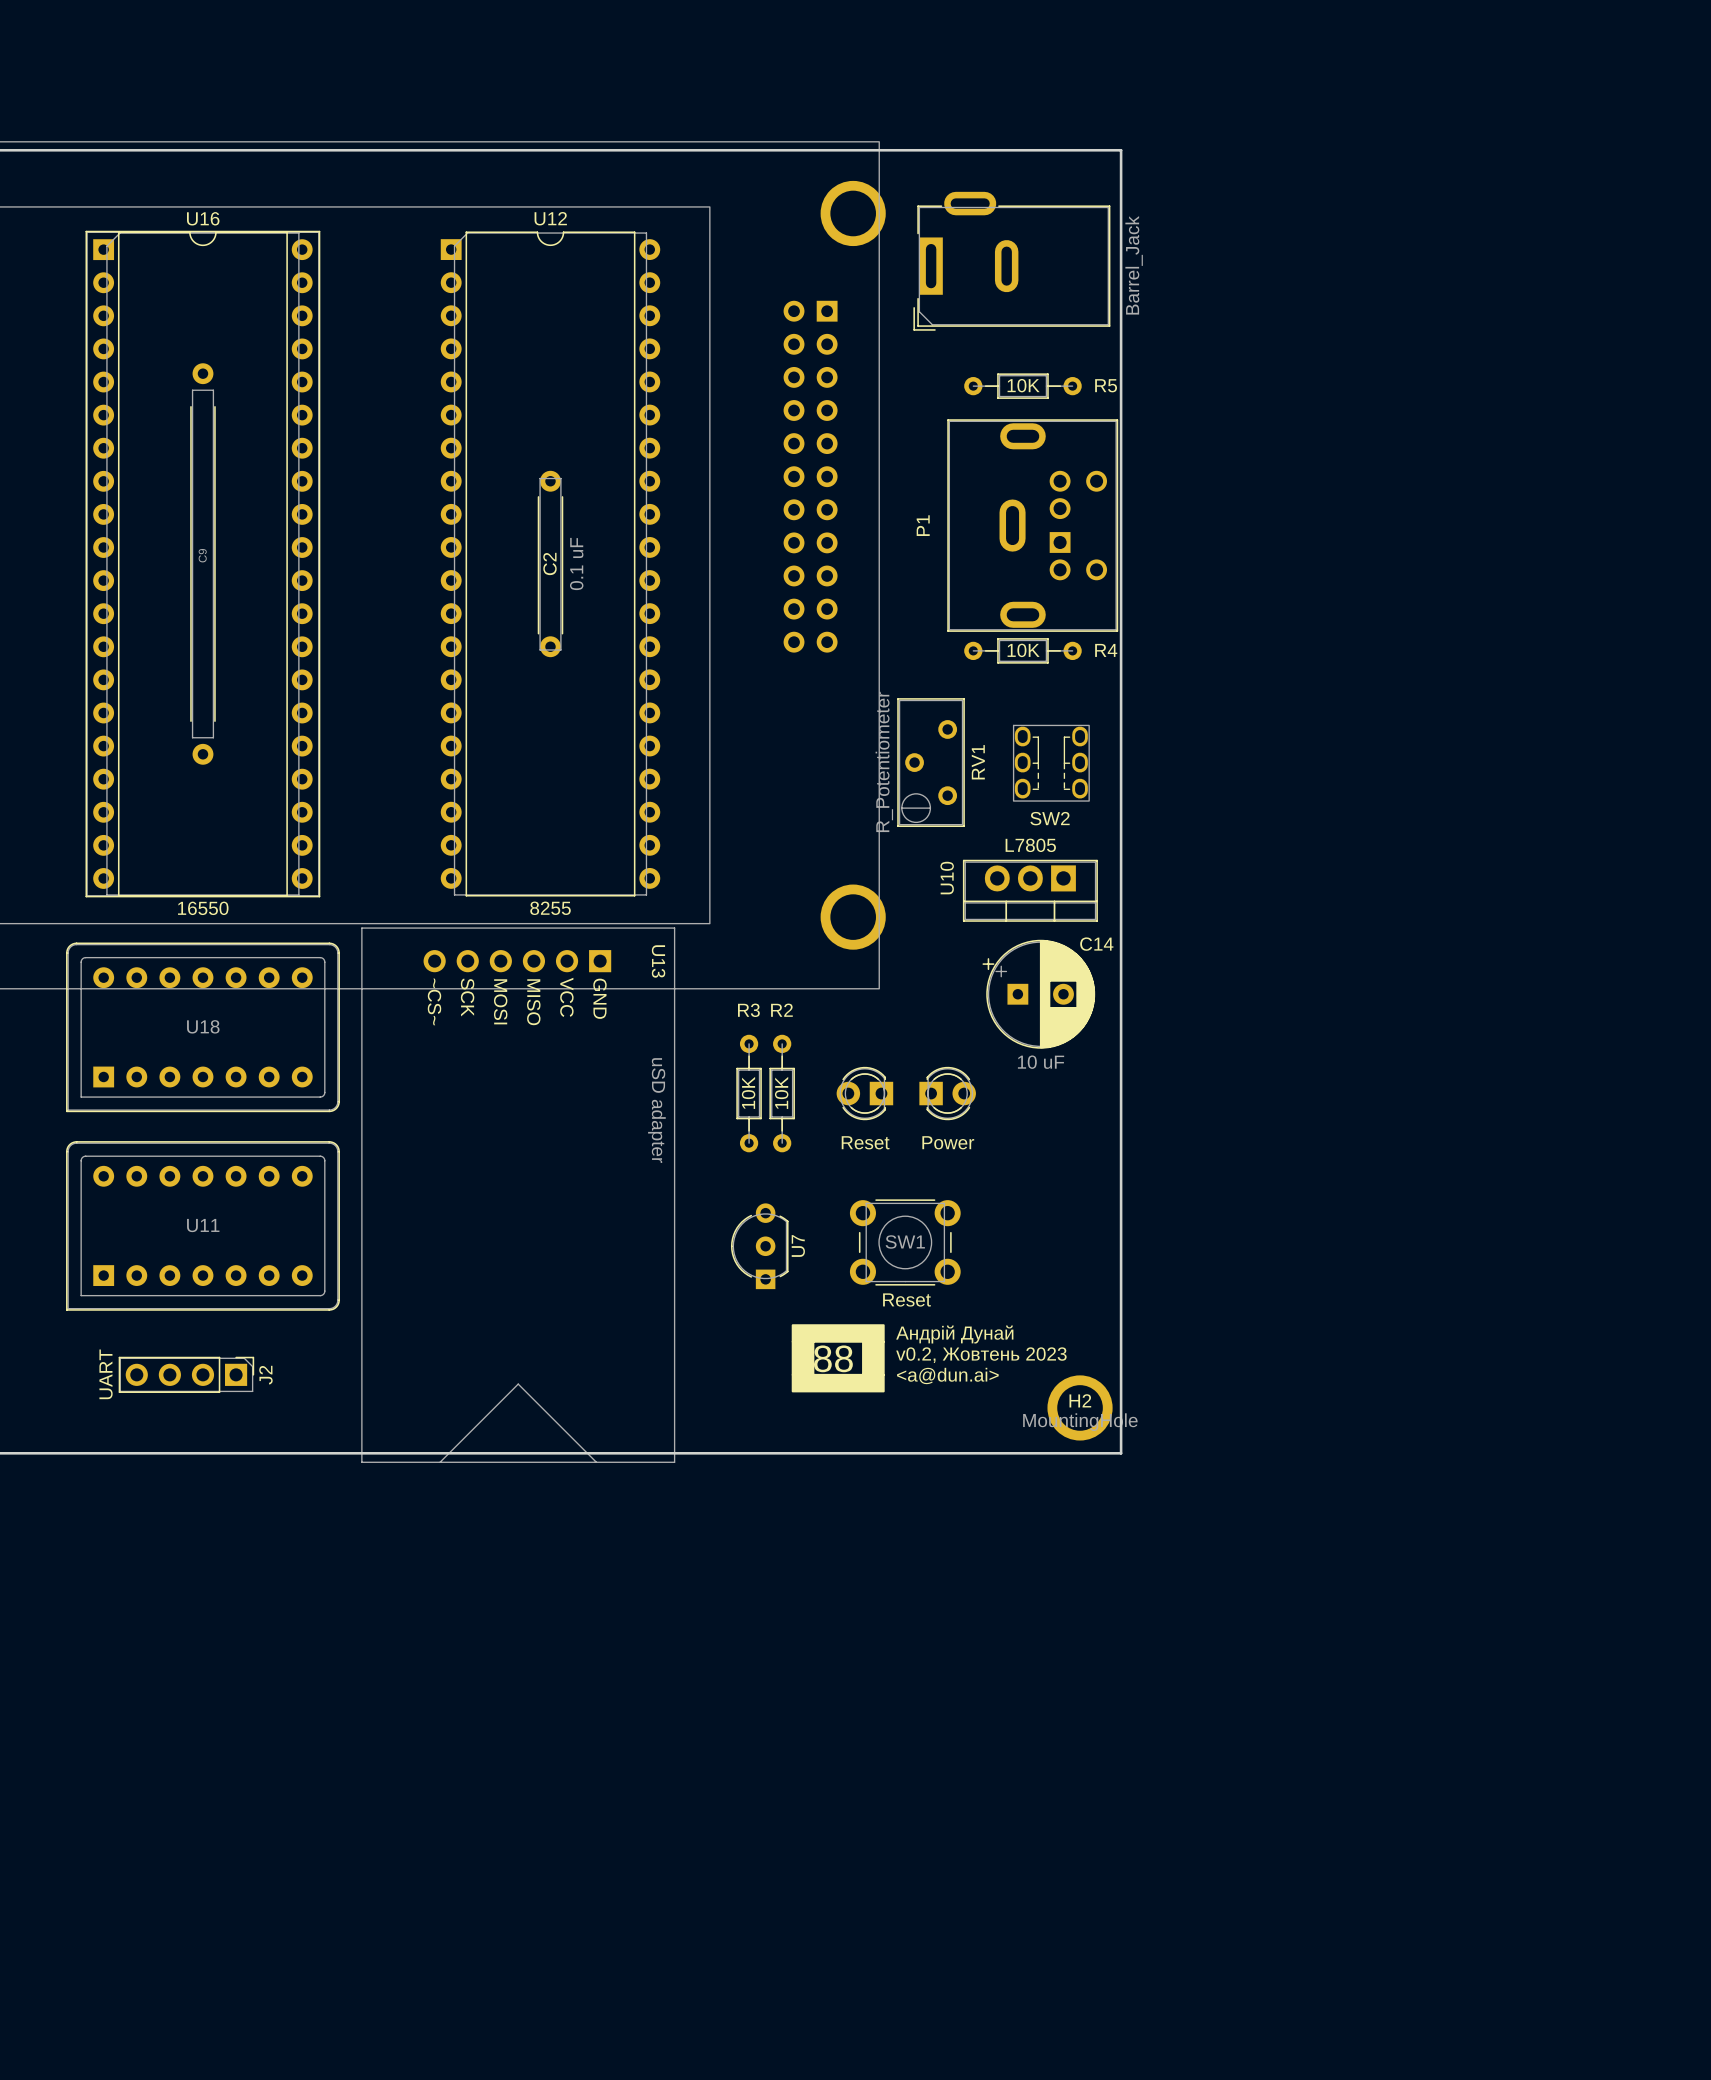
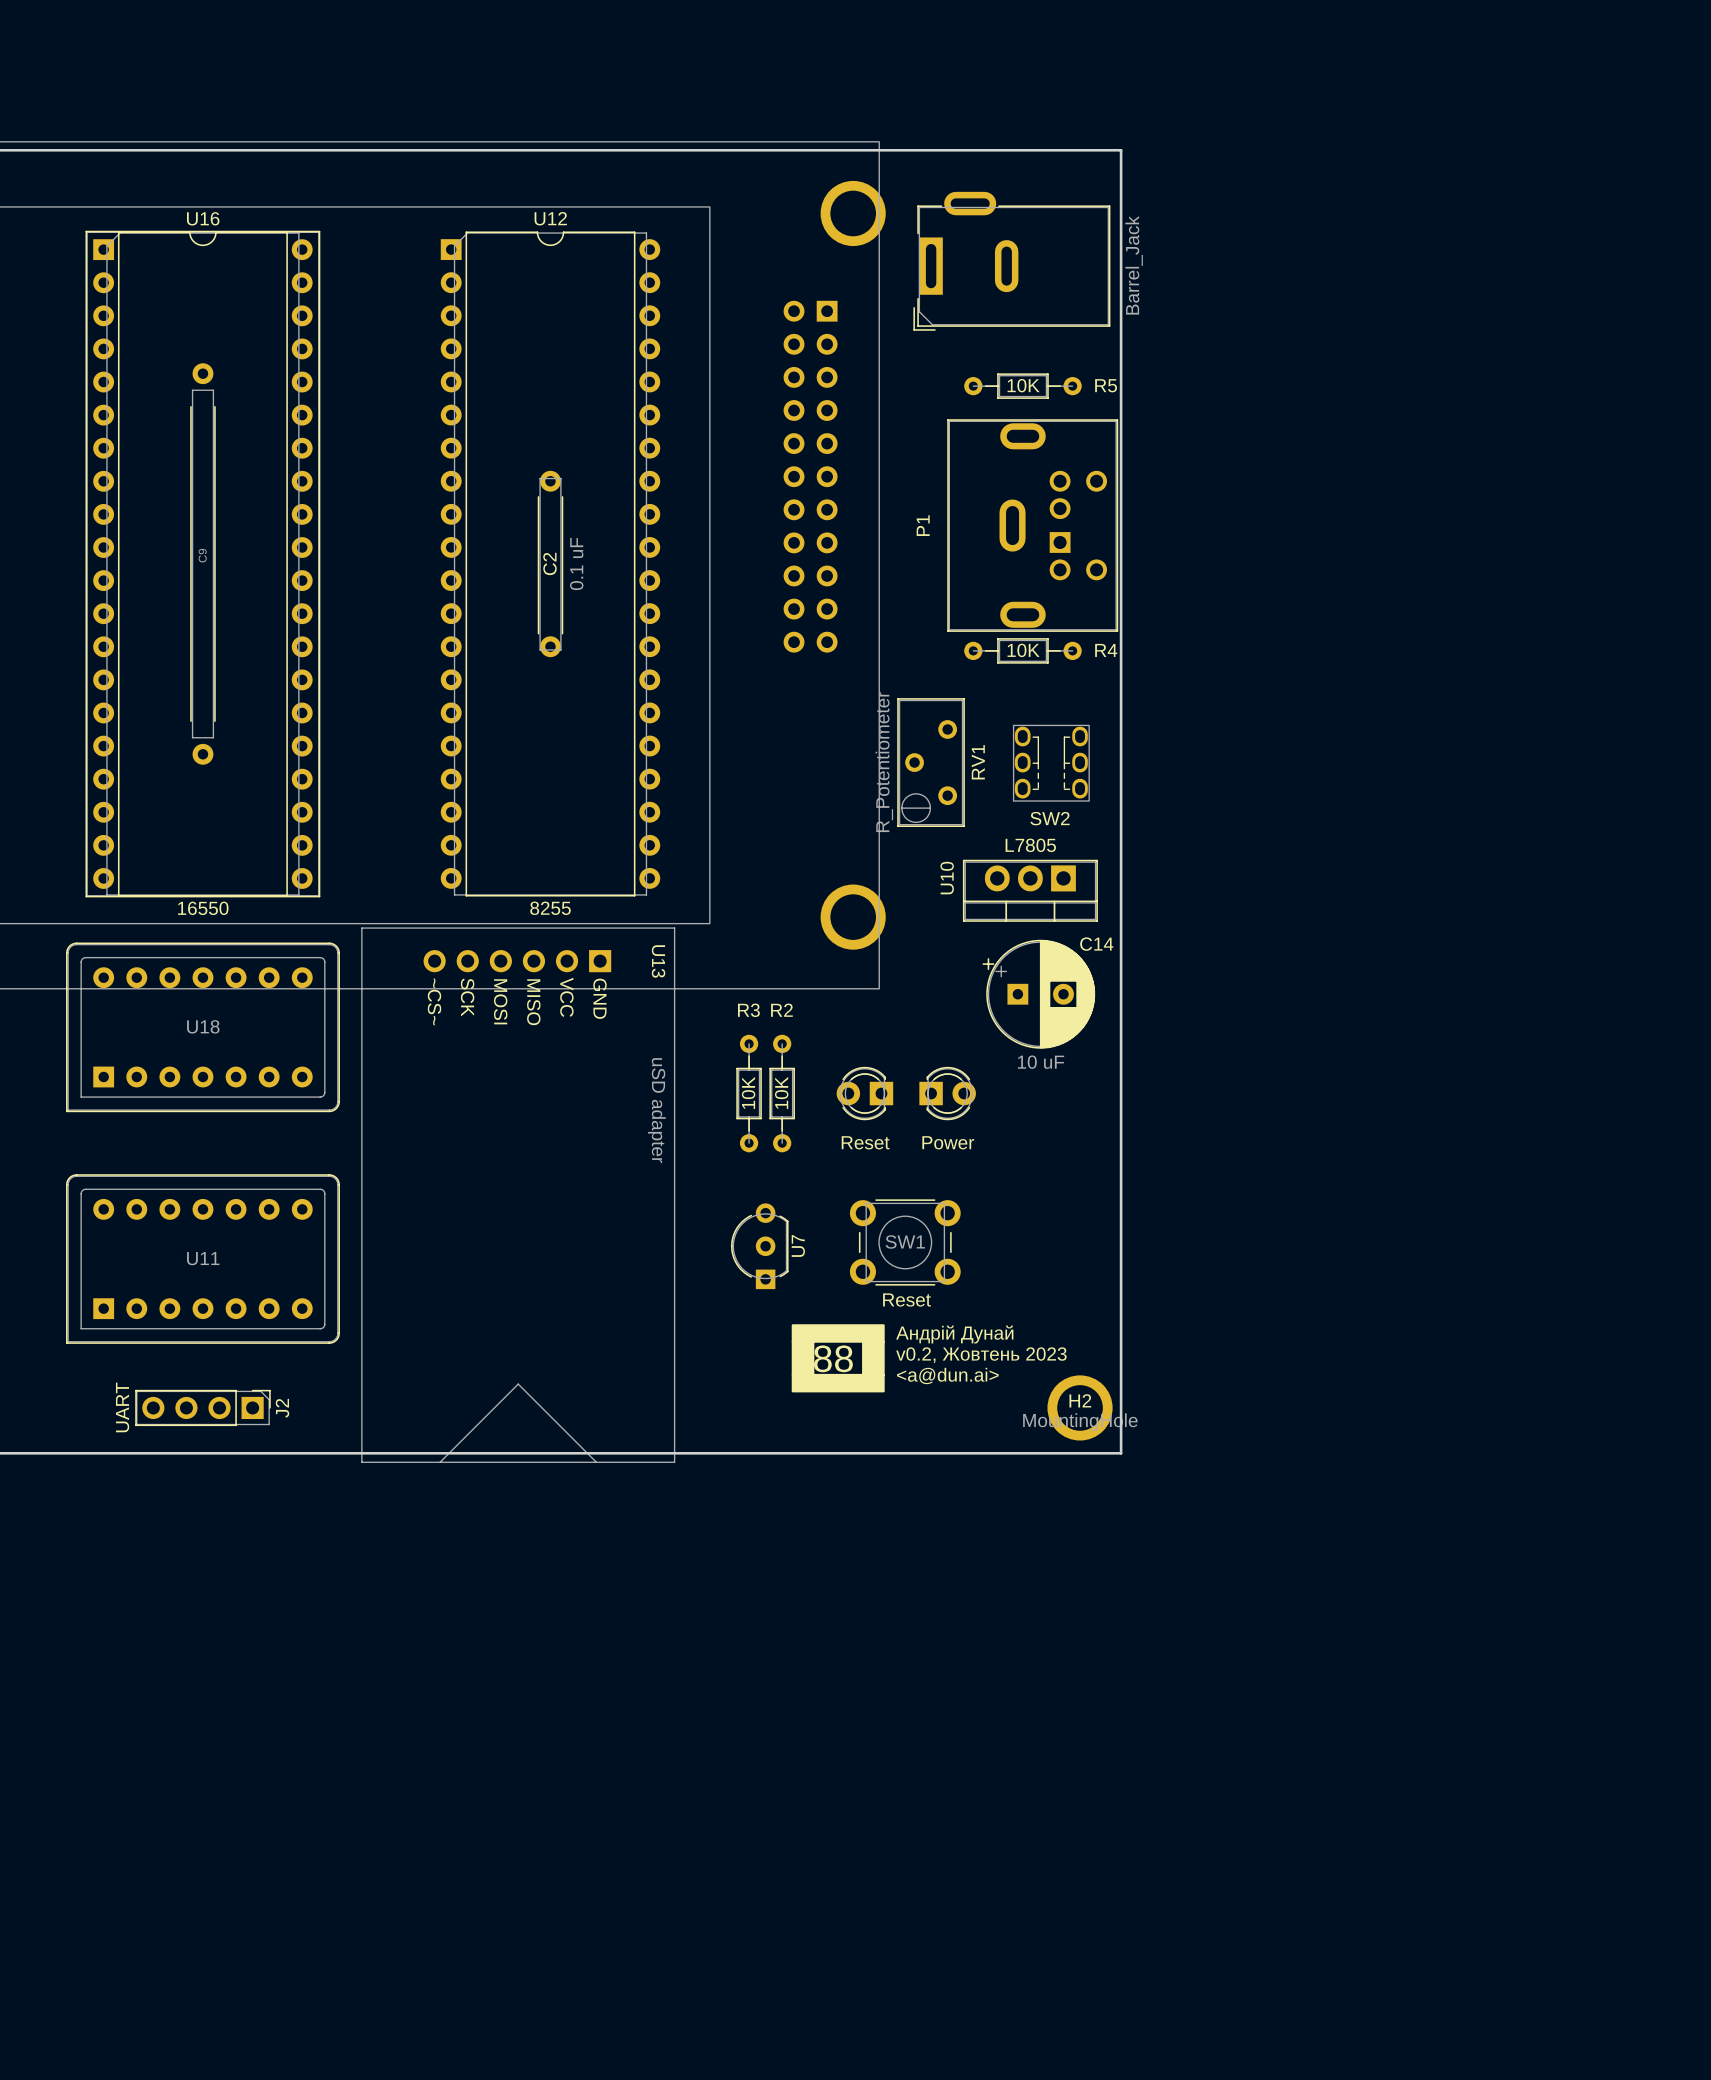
U11 position: (202, 1225) -> (202, 1259)
J2 position: (186, 1374) -> (202, 1407)

